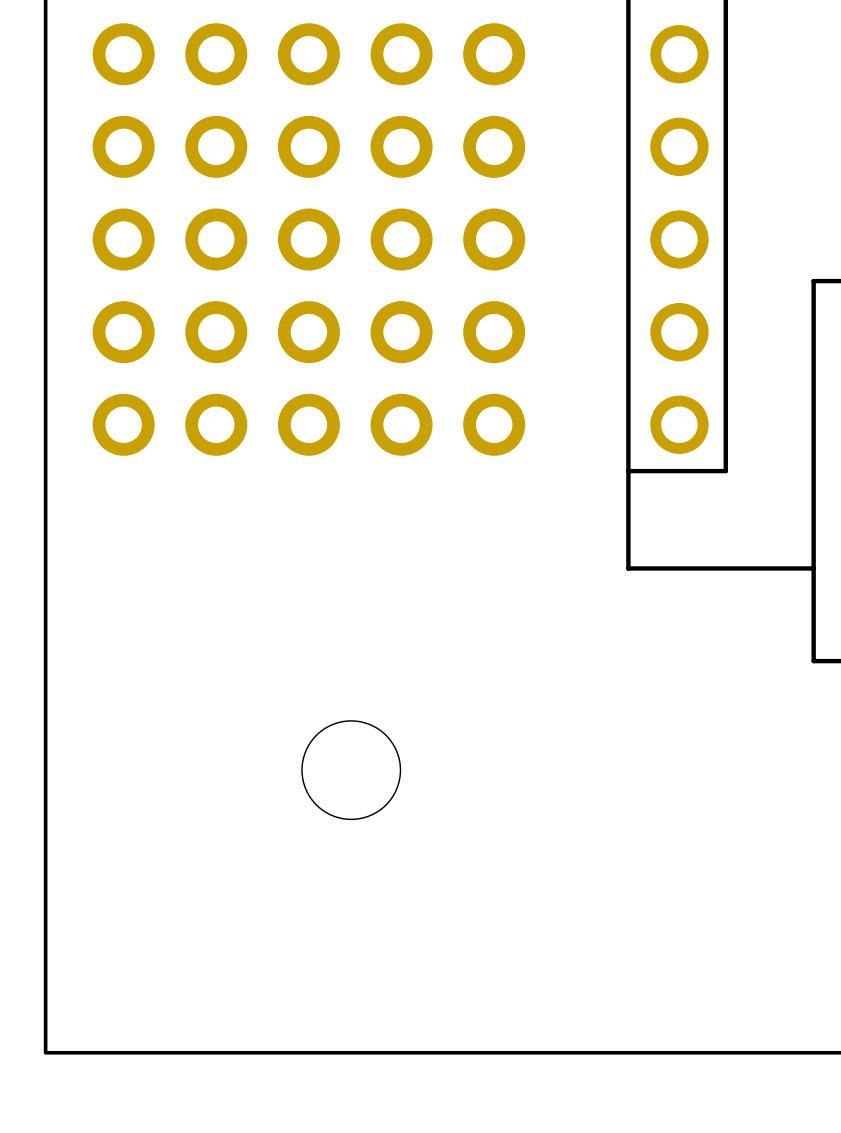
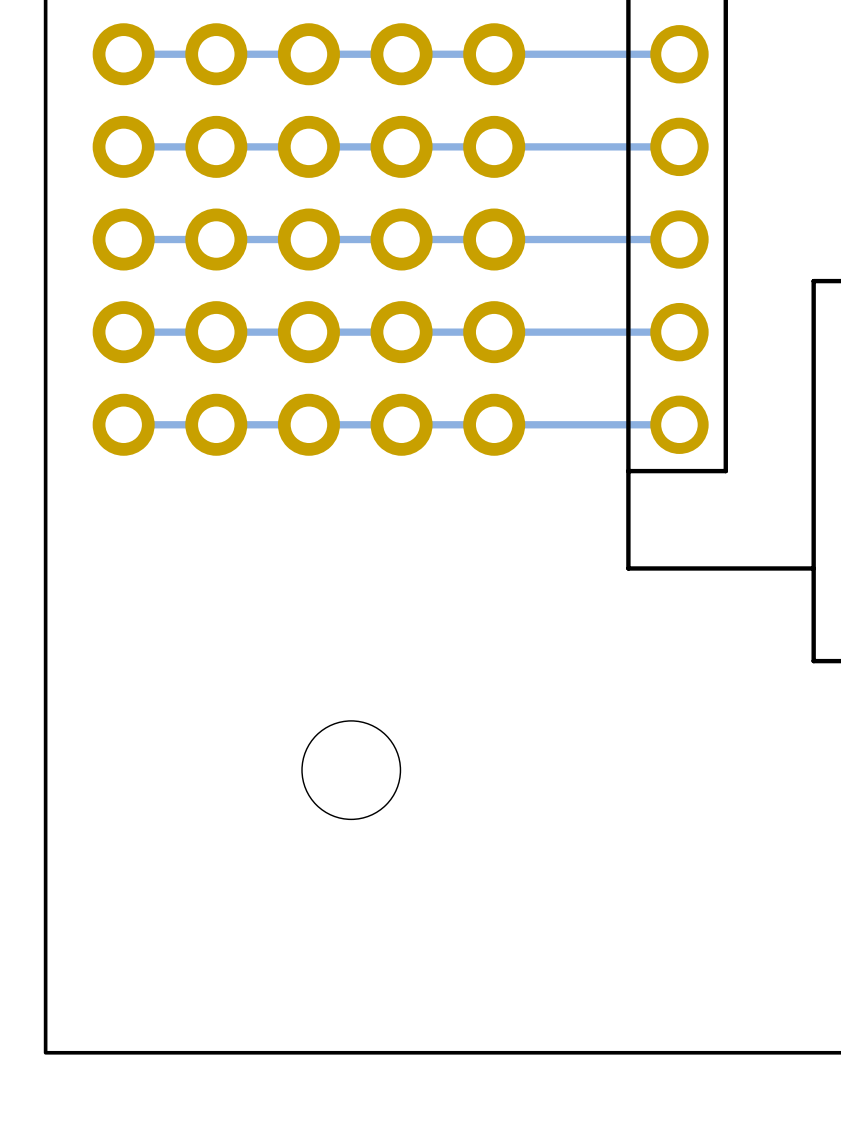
bottom track: none -> (123, 54) (679, 54)
bottom track: none -> (123, 146) (679, 146)
bottom track: none -> (123, 239) (679, 239)
bottom track: none -> (123, 332) (679, 332)
bottom track: none -> (123, 424) (679, 424)

